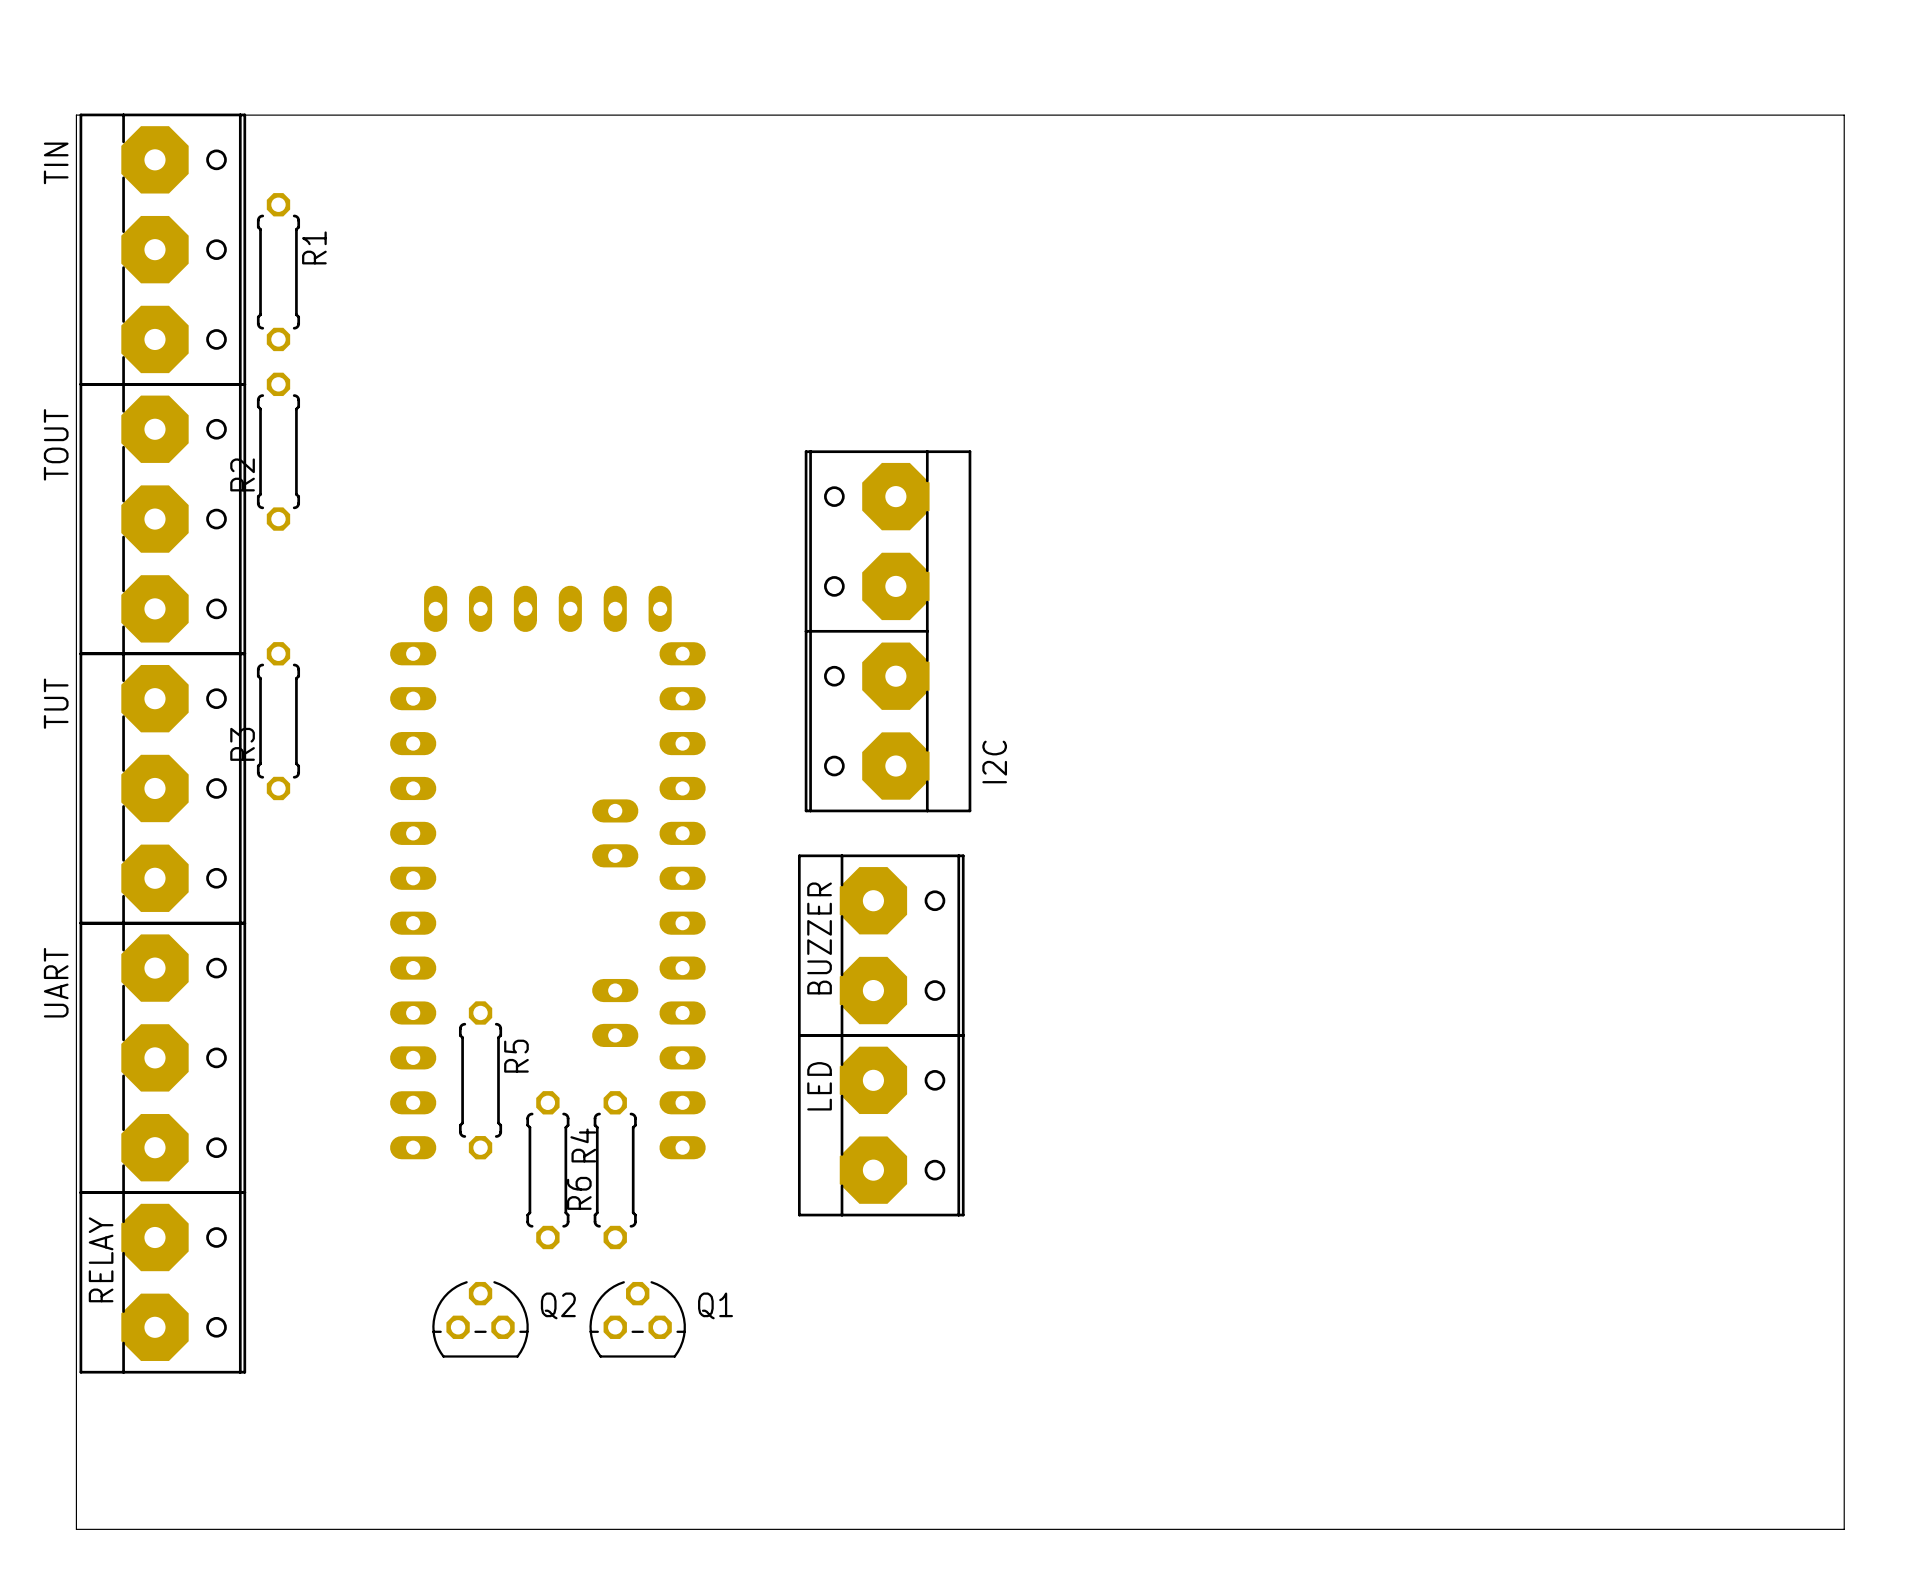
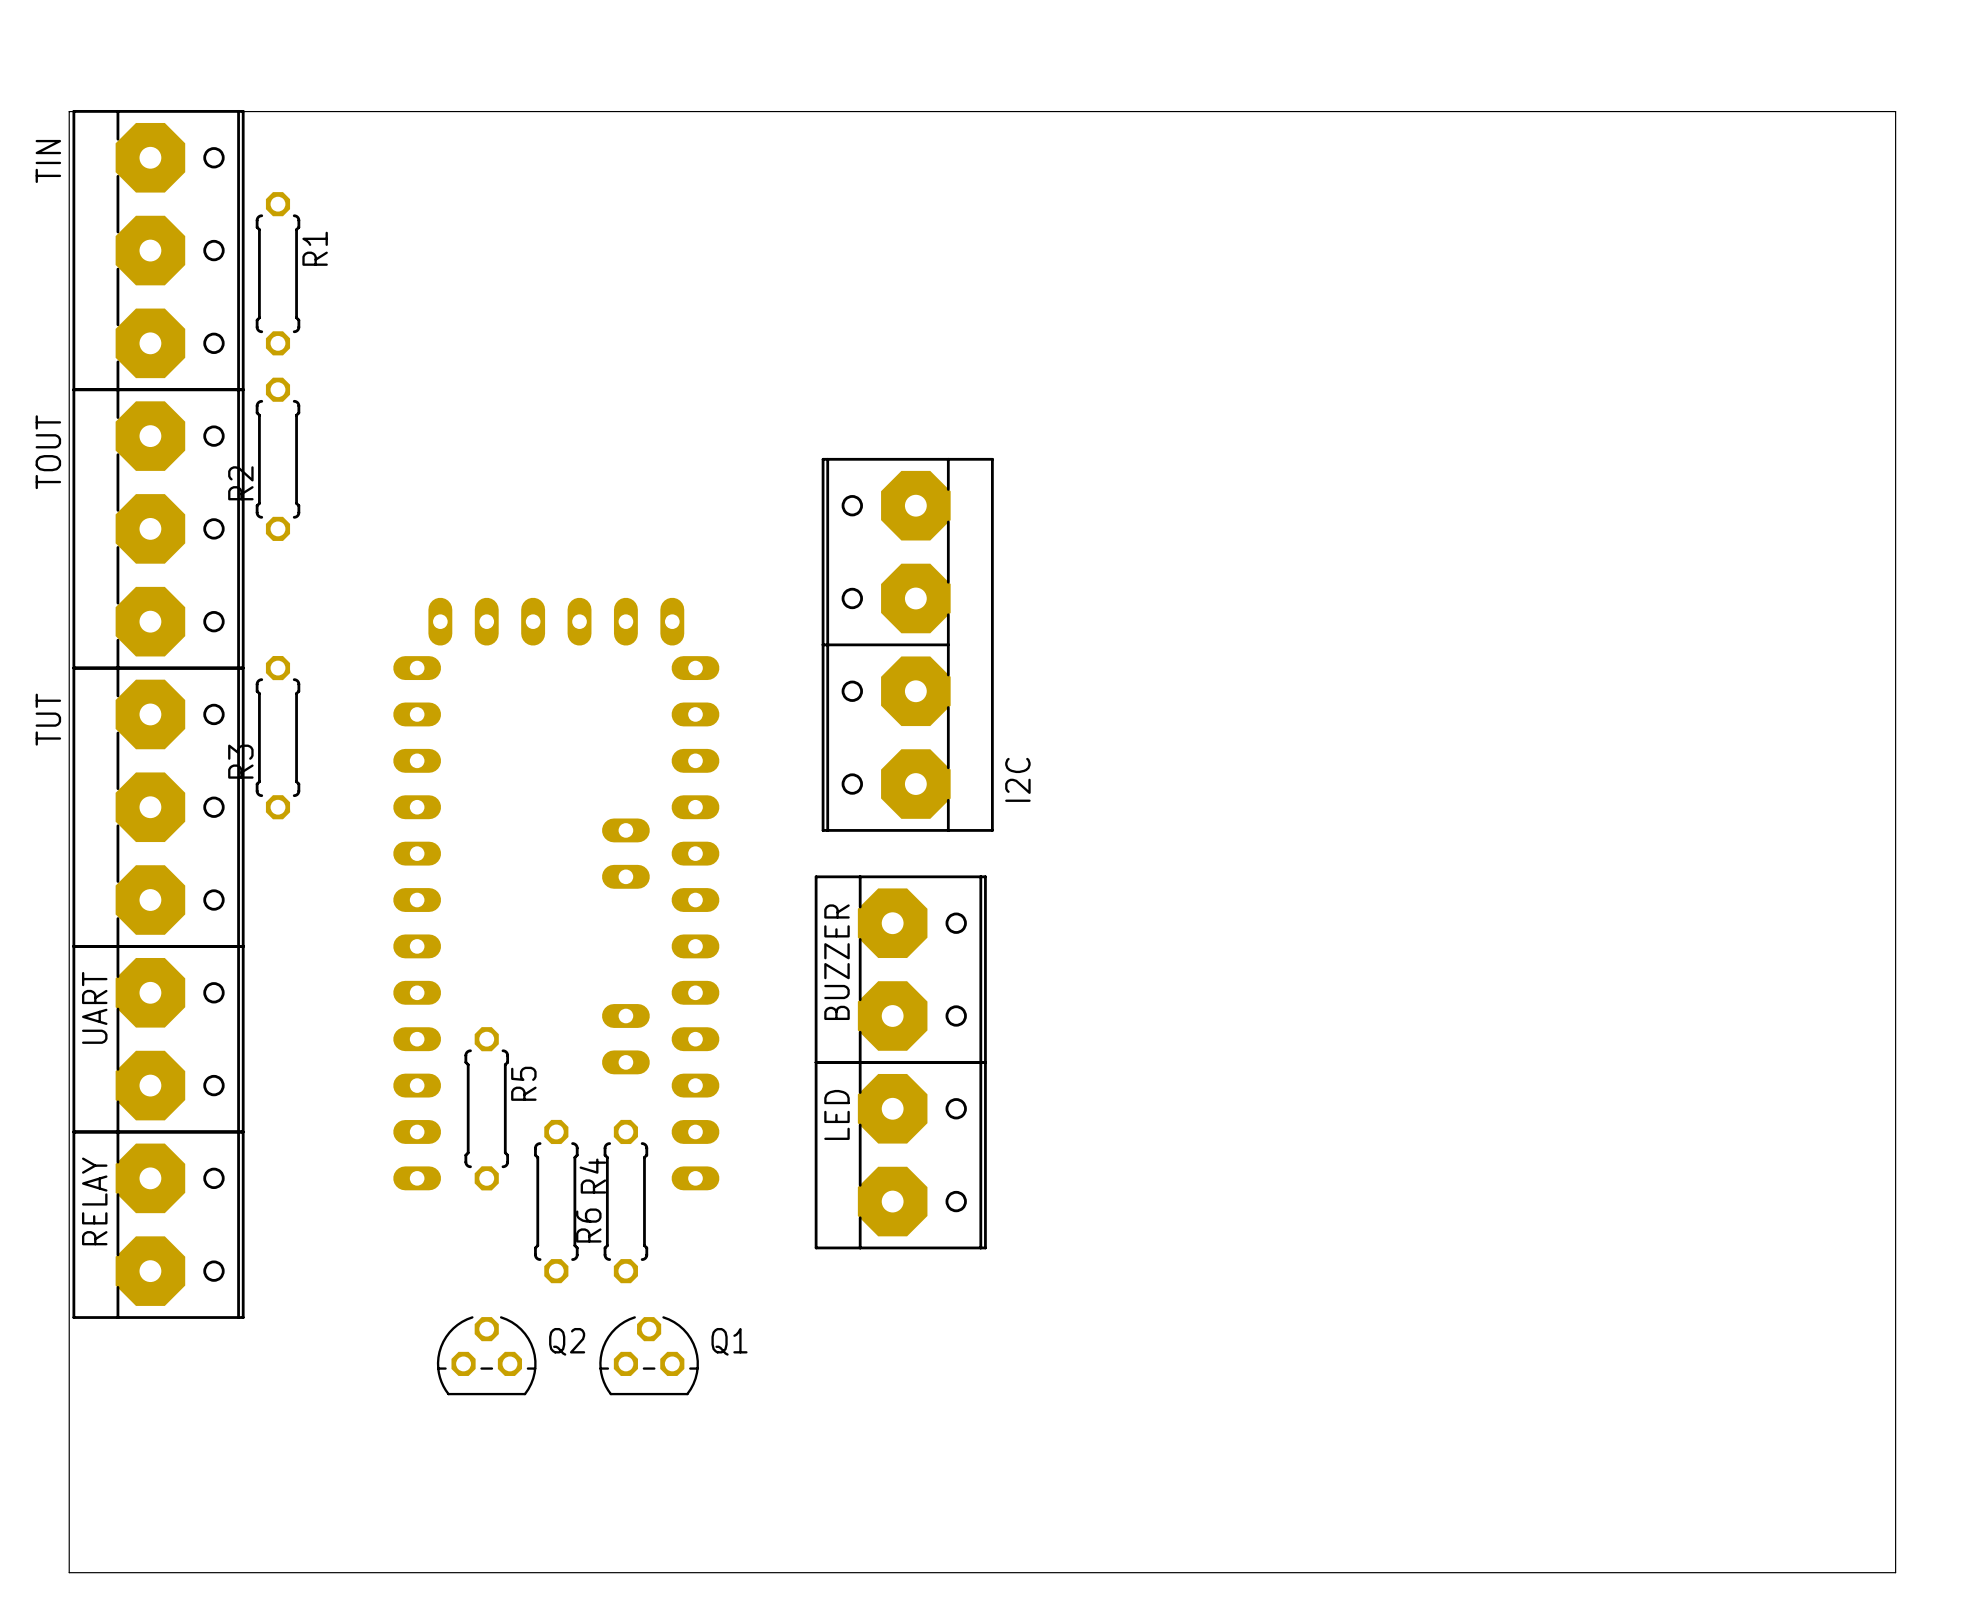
UART: none -> (158, 1039)
UART: (162, 1057) -> none
RELAY position: (162, 1282) -> (158, 1224)

